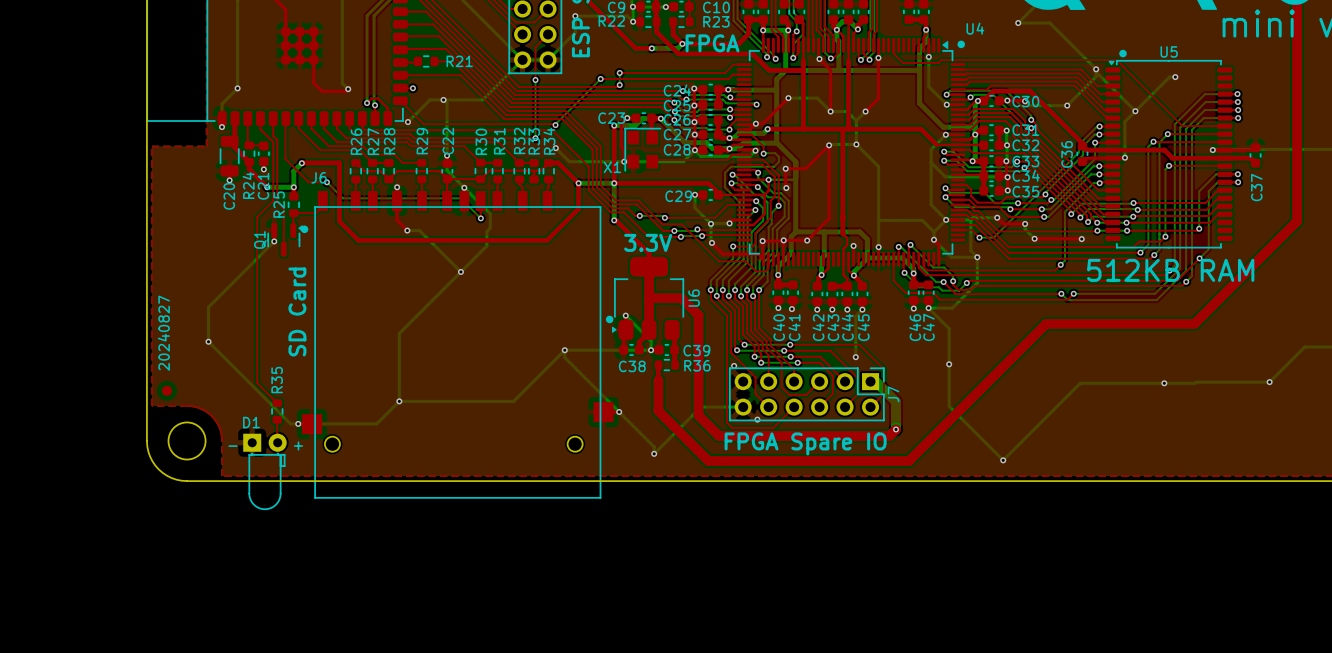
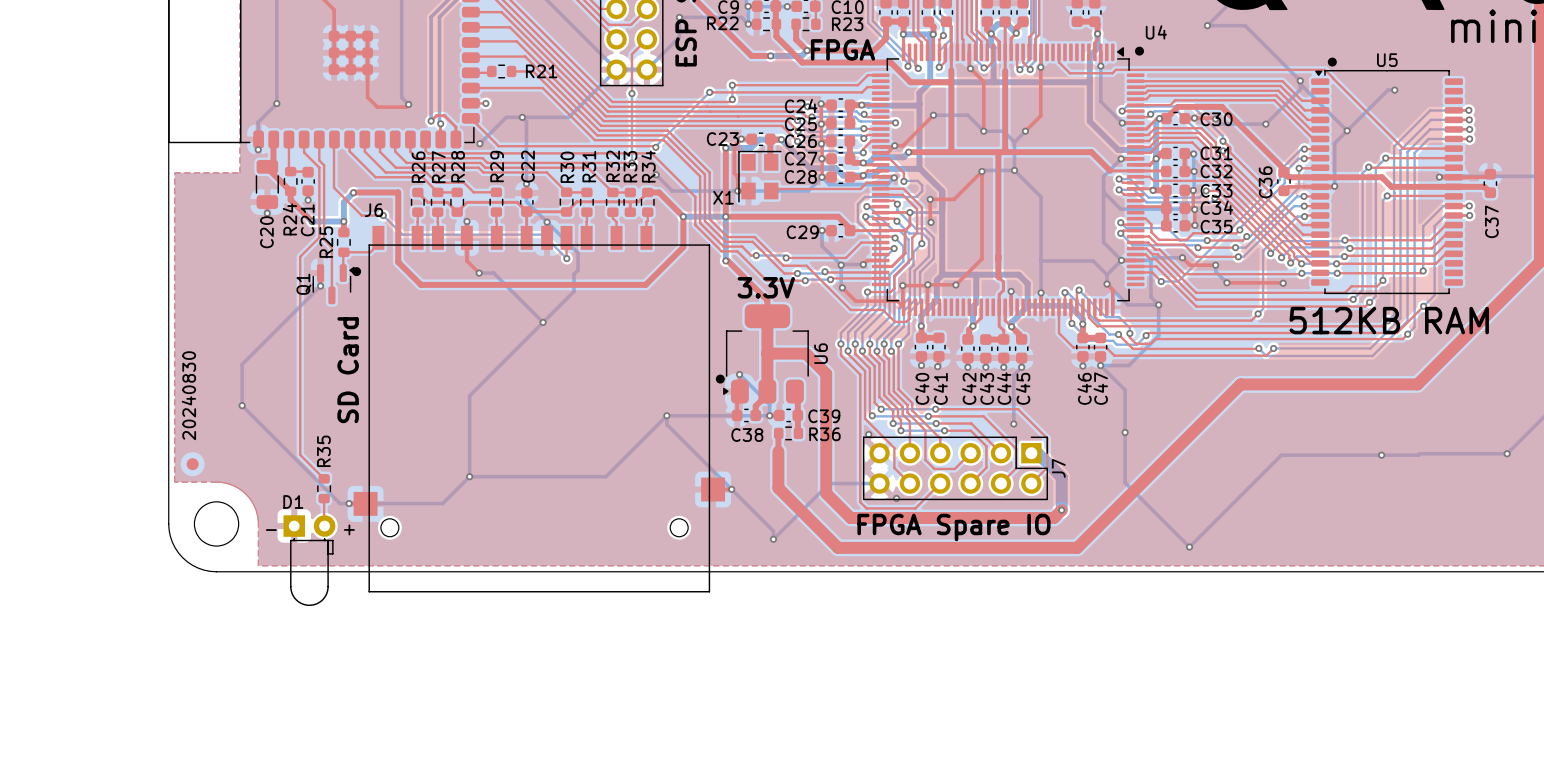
text: 20240827 (163, 333) -> 20240830 (188, 395)

